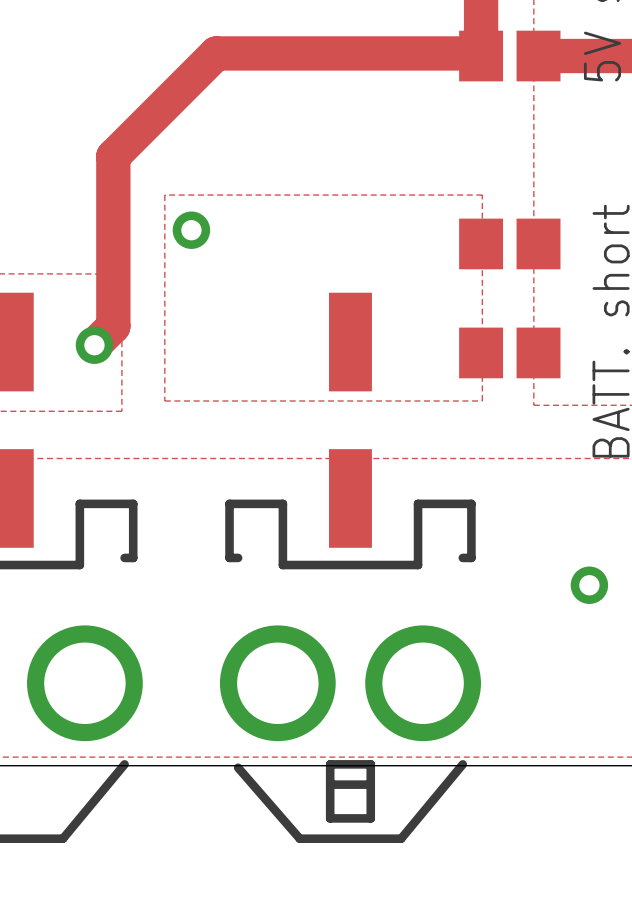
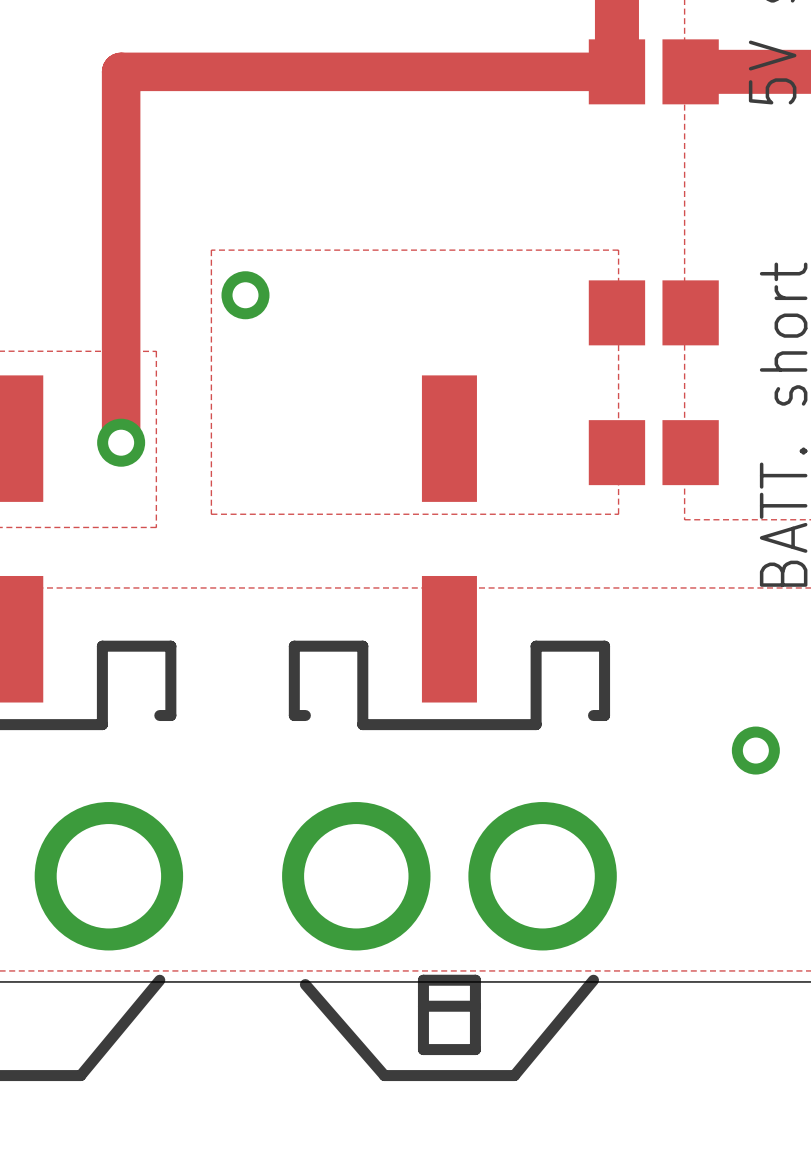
track: (482, 62) (473, 53) (216, 53) (113, 156) (113, 326) (94, 345) -> (616, 71) (121, 71) (121, 442)

